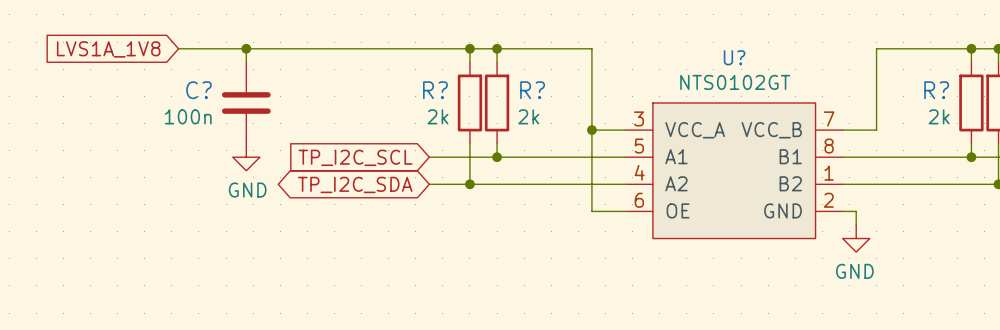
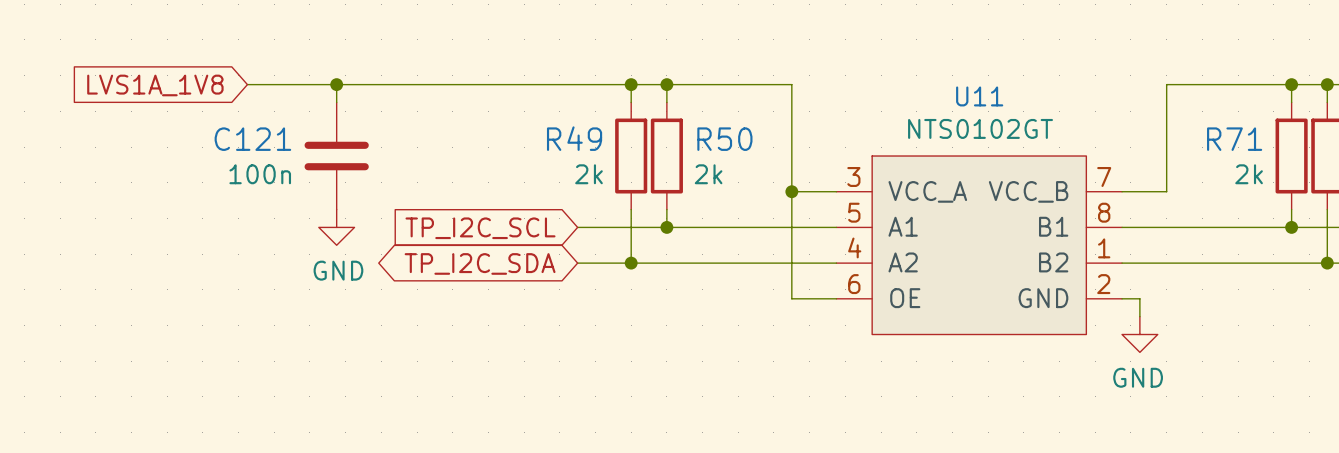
U? name: U? (734, 57) -> U11 (979, 96)
C? name: C? (198, 90) -> C121 (252, 139)
R? name: R? (435, 90) -> R49 (574, 138)
R? name: R? (532, 90) -> R50 (724, 139)
R? name: R? (936, 90) -> R71 (1234, 139)

